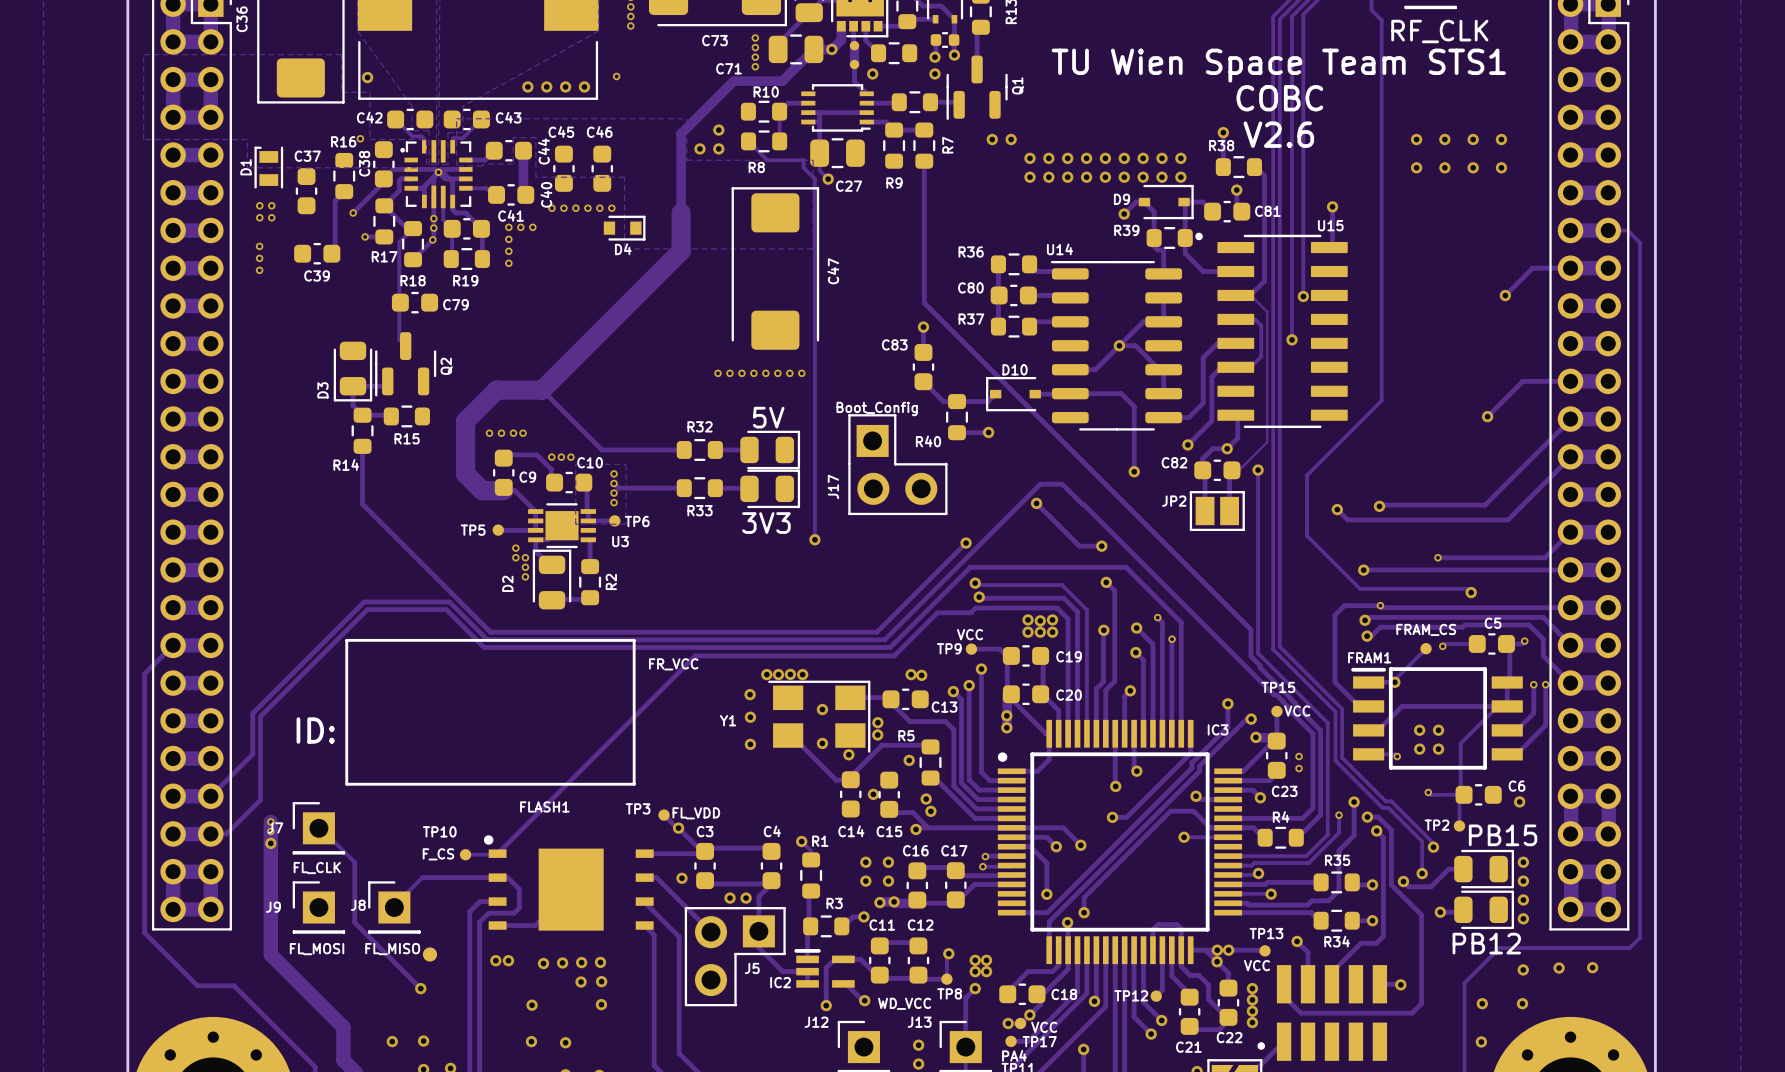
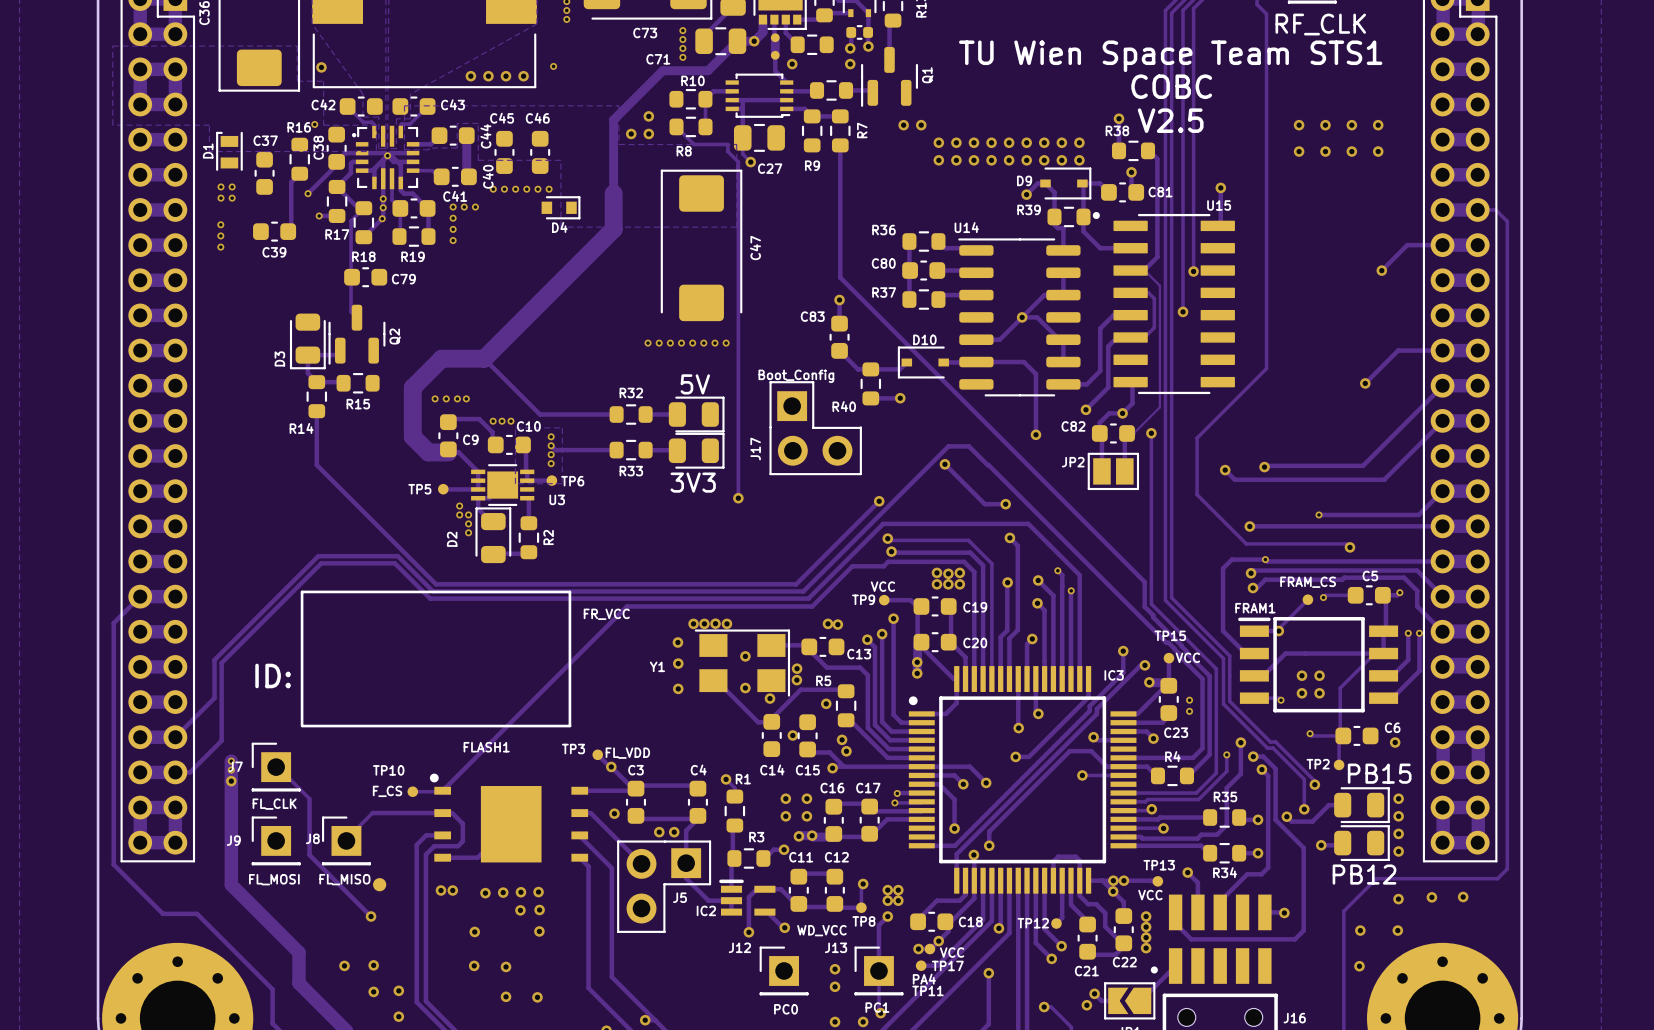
text: V2.6 (1278, 134) -> V2.5 (1170, 120)

